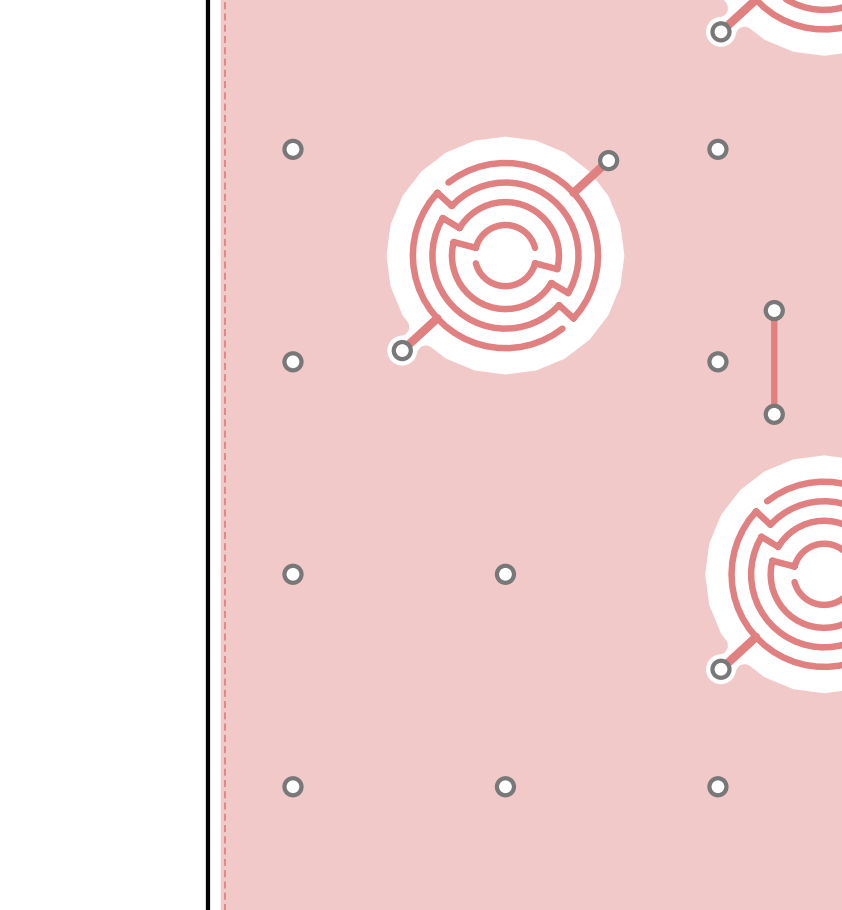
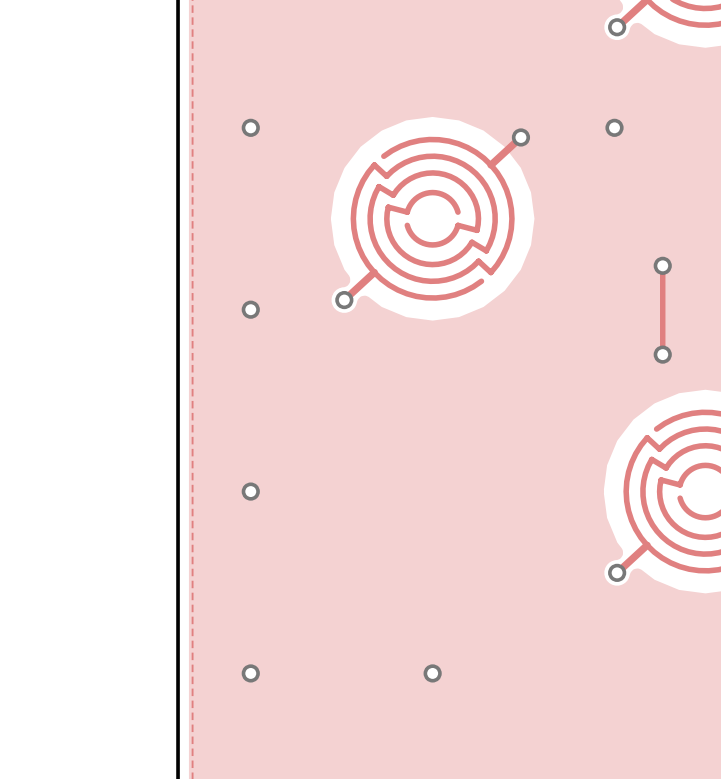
via: (717, 361) -> none
via: (505, 574) -> none
via: (717, 786) -> none

